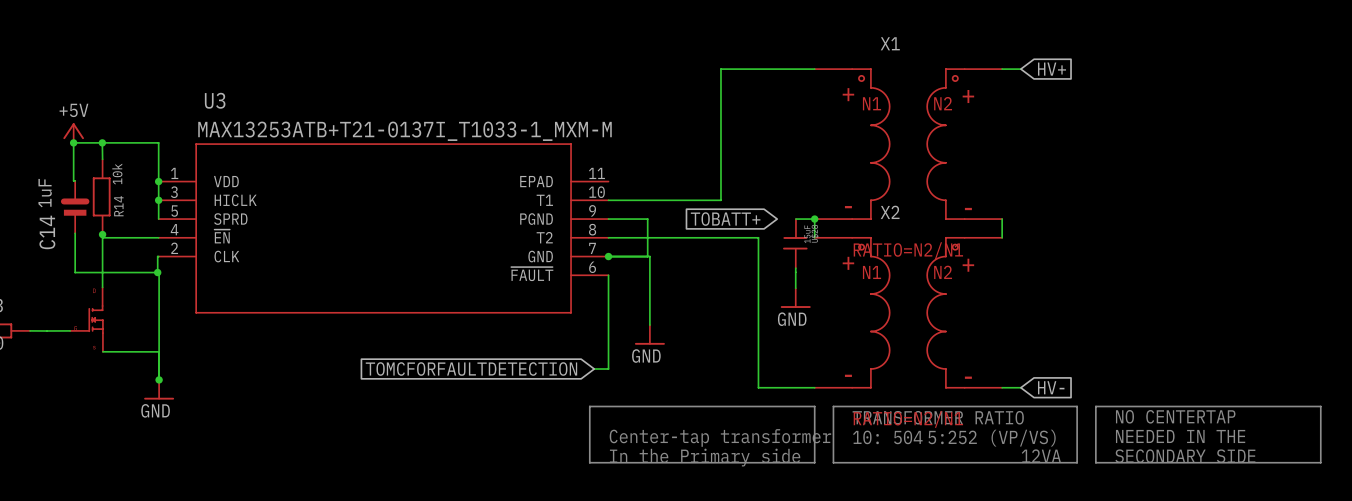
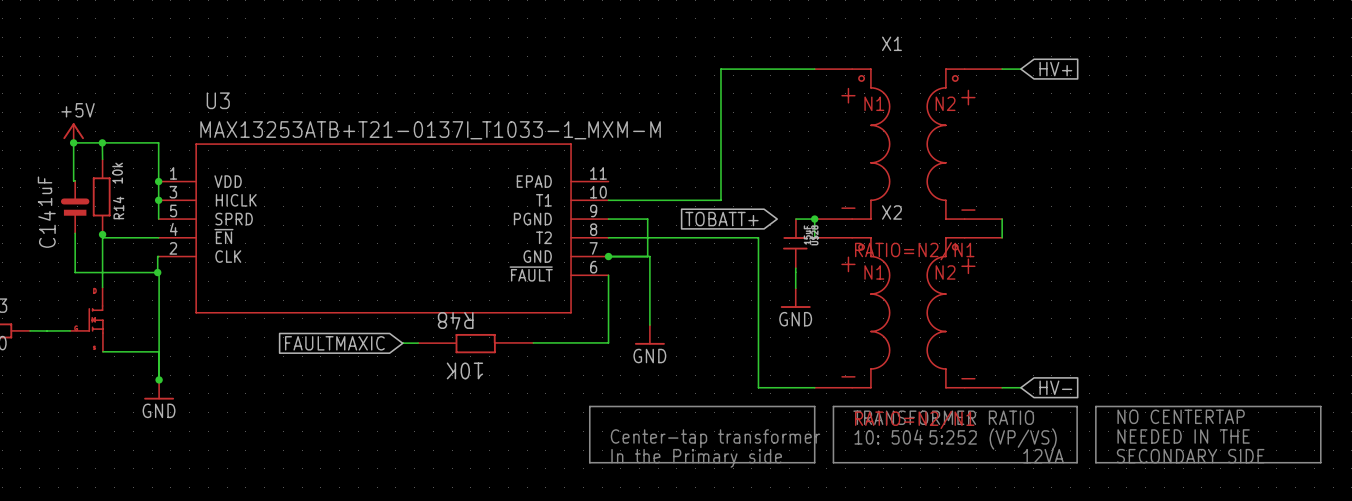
wire: none -> (403, 342) (418, 343)
wire: (608, 342) (608, 369) (594, 369) -> (608, 342) (533, 342)
global label: none -> FAULTMAXIC (334, 343)
R48: none -> 10K (475, 343)
global label: TOMCFORFAULTDETECTION (471, 369) -> none

